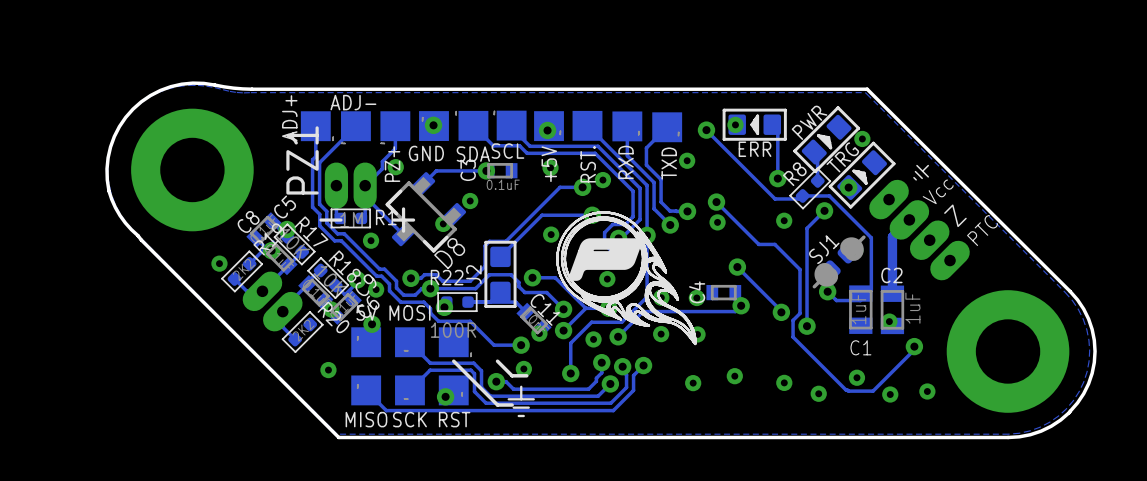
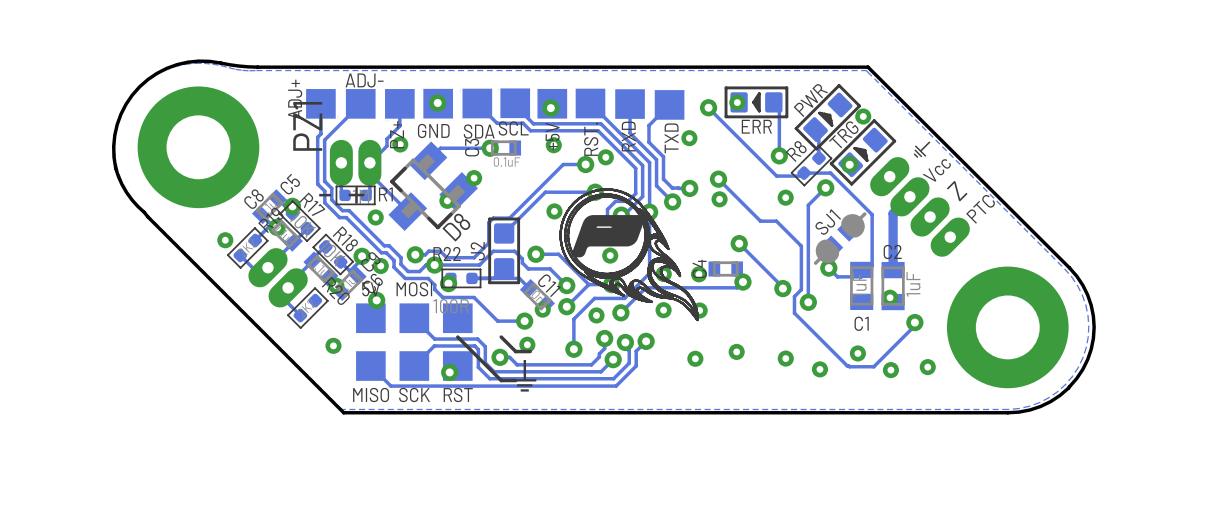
D8 footprint: [385, 172, 467, 253] -> [388, 141, 478, 231]
SJ1 footprint: [812, 235, 866, 289] -> [813, 212, 867, 265]

